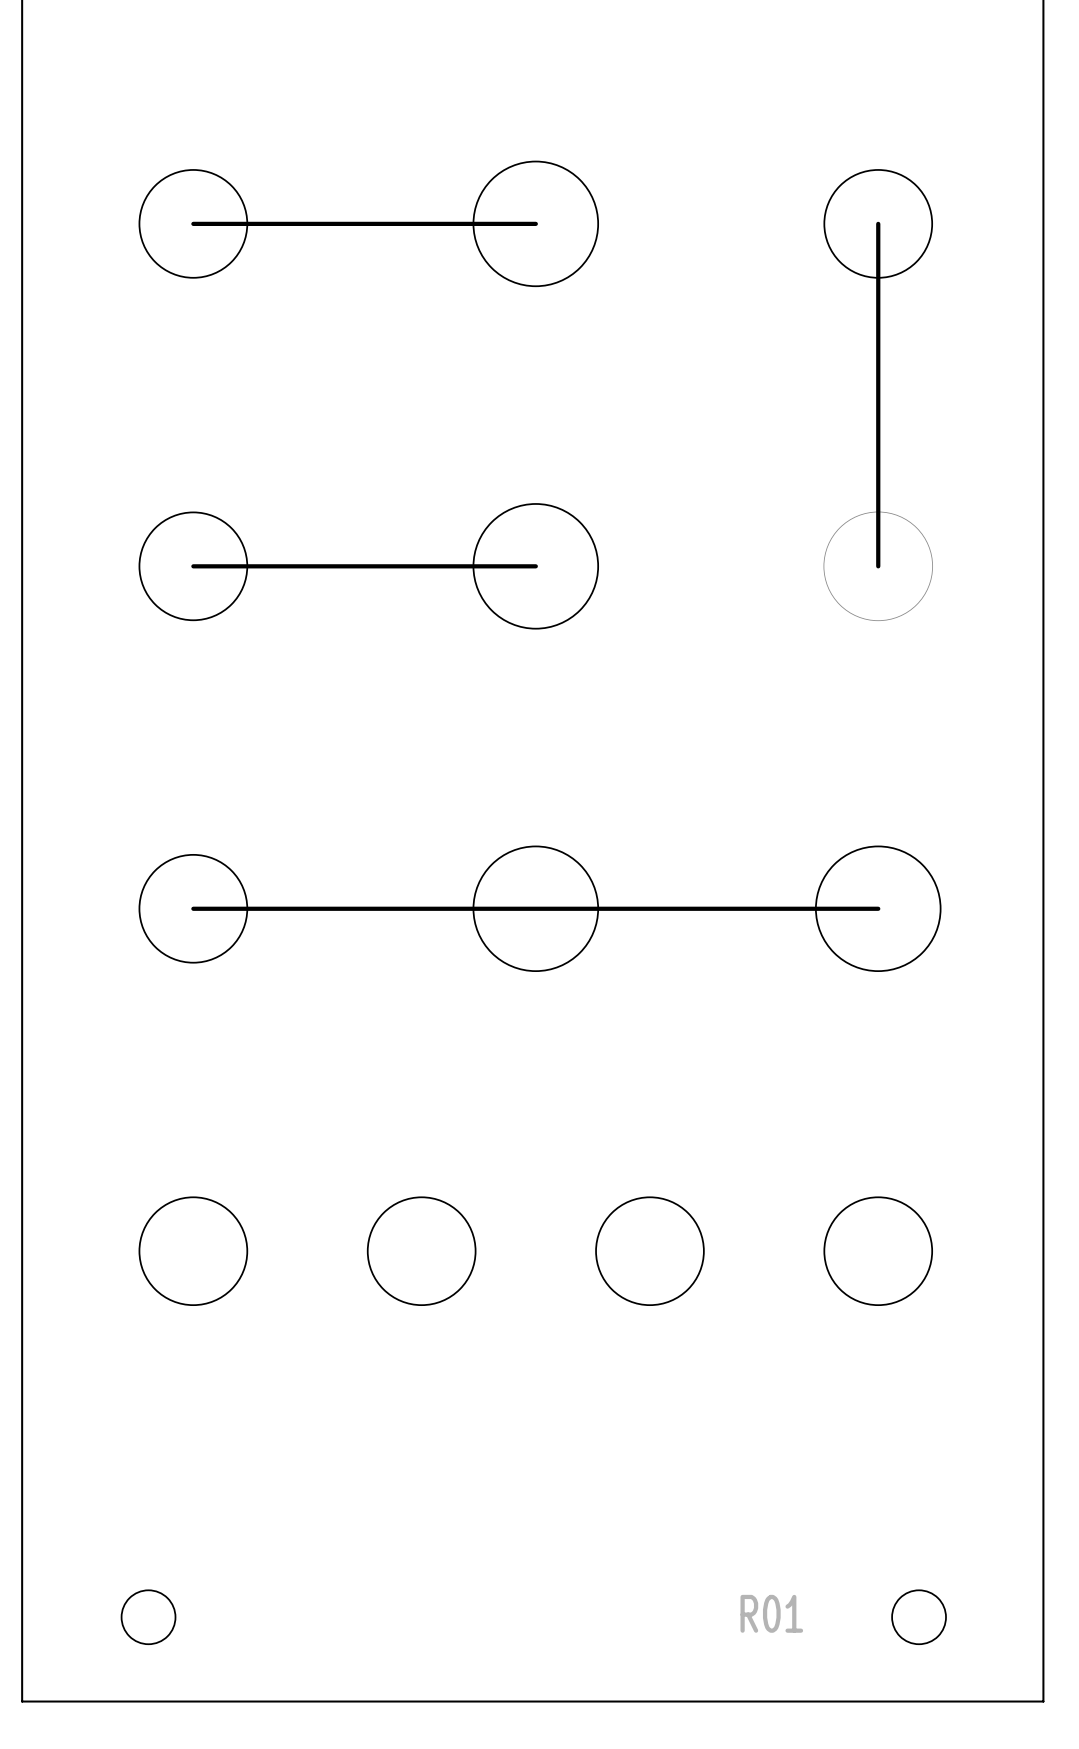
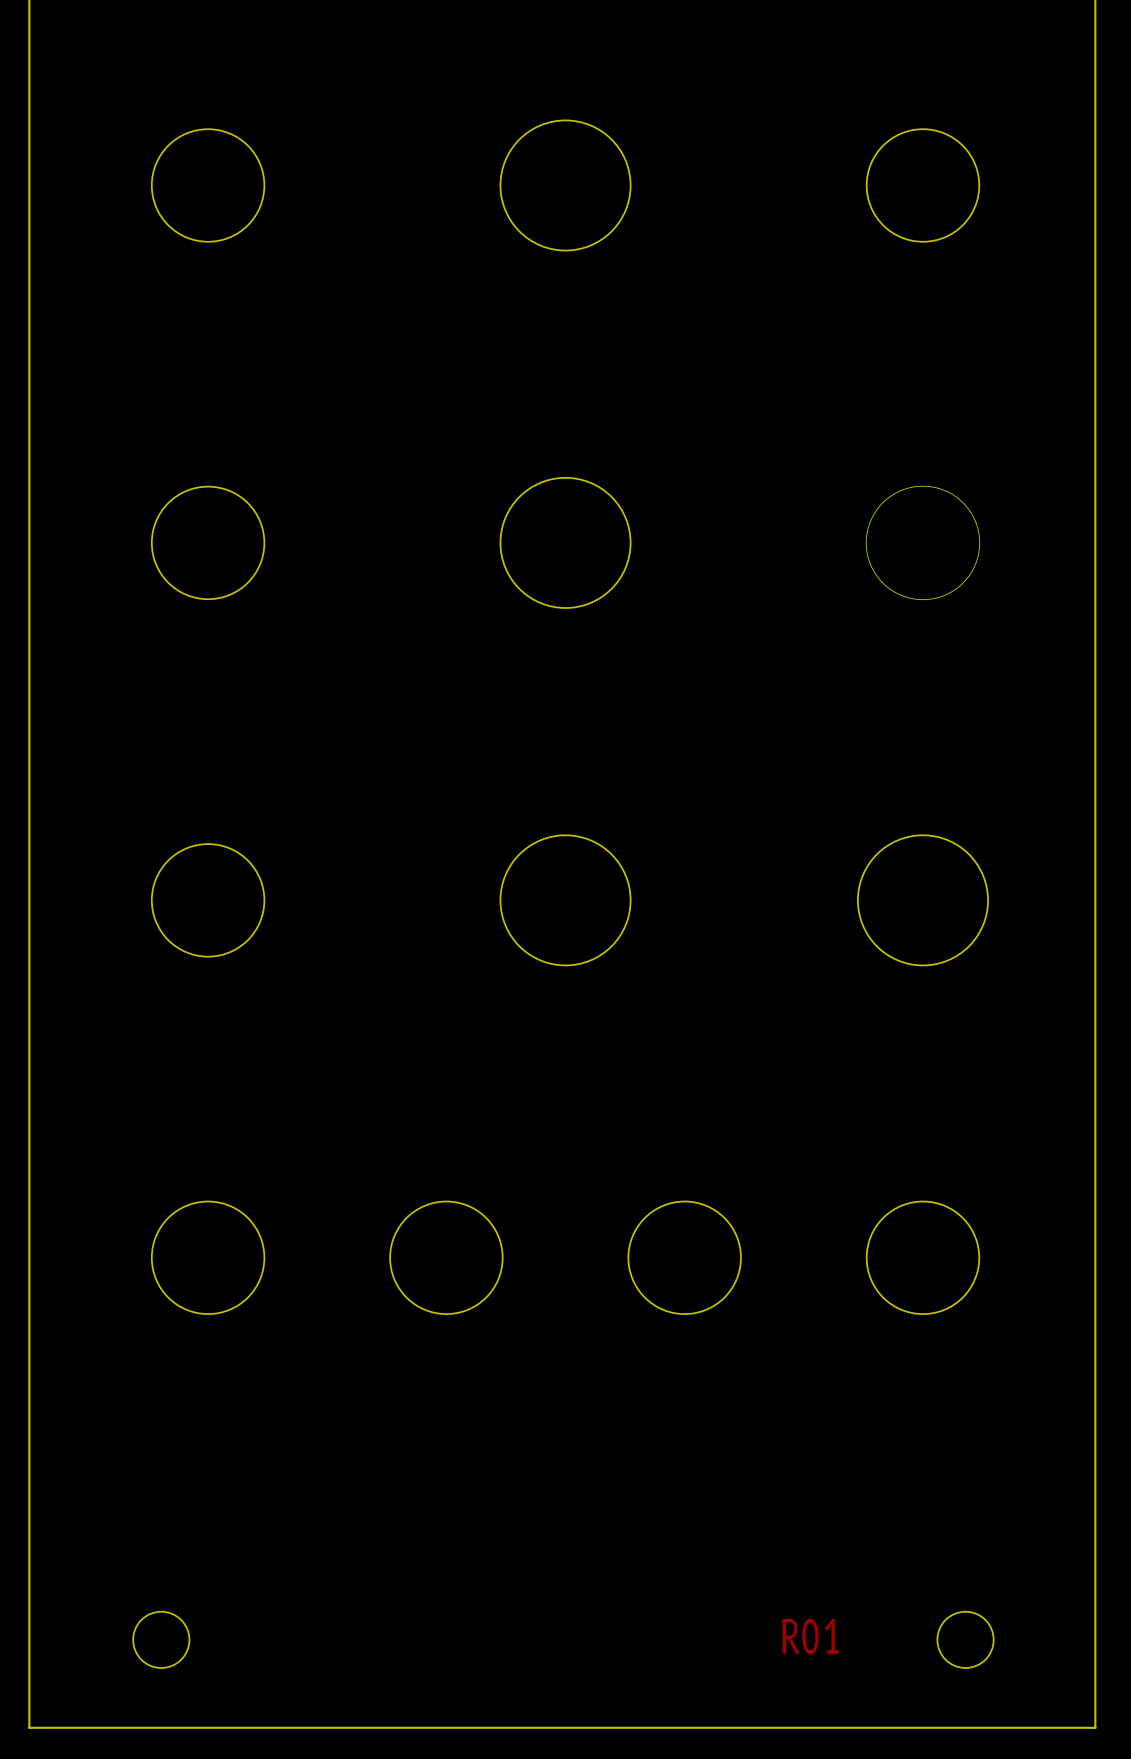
line: (193, 223) (535, 223) -> none
line: (878, 223) (878, 566) -> none
line: (193, 566) (535, 566) -> none
line: (193, 908) (878, 908) -> none

